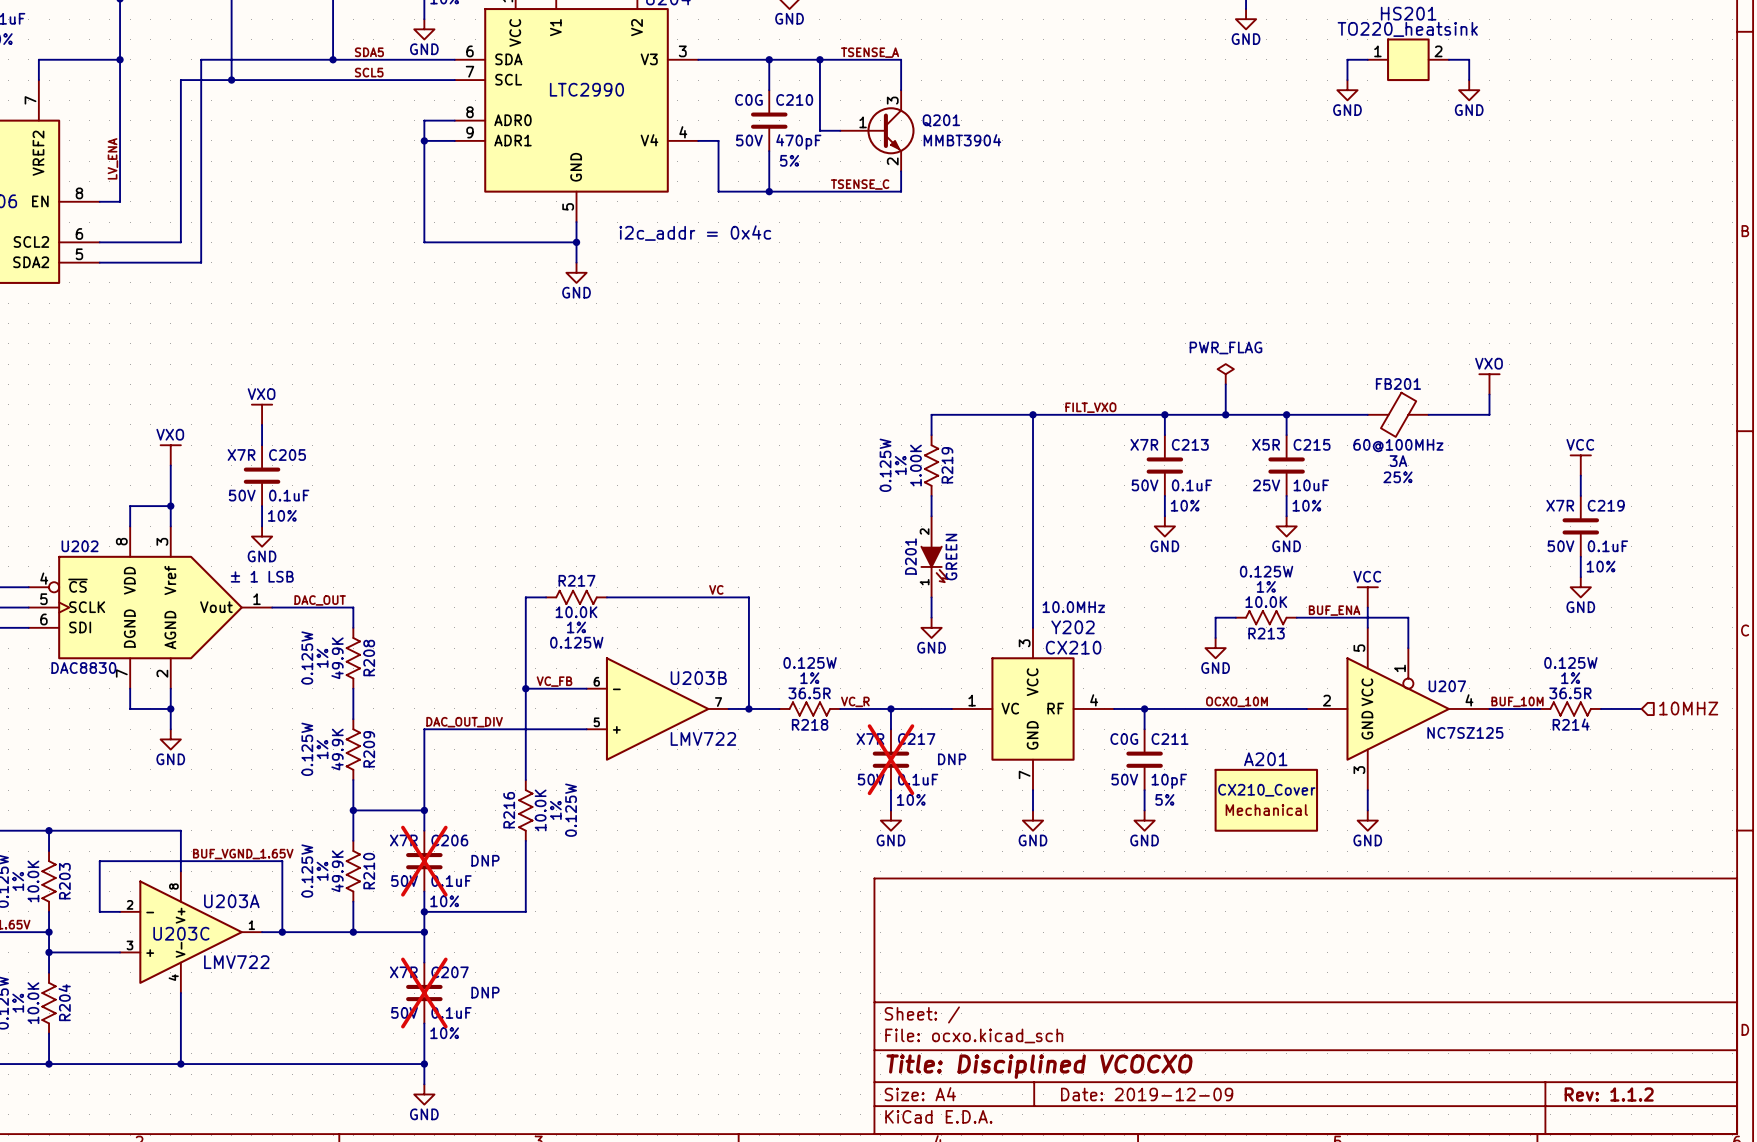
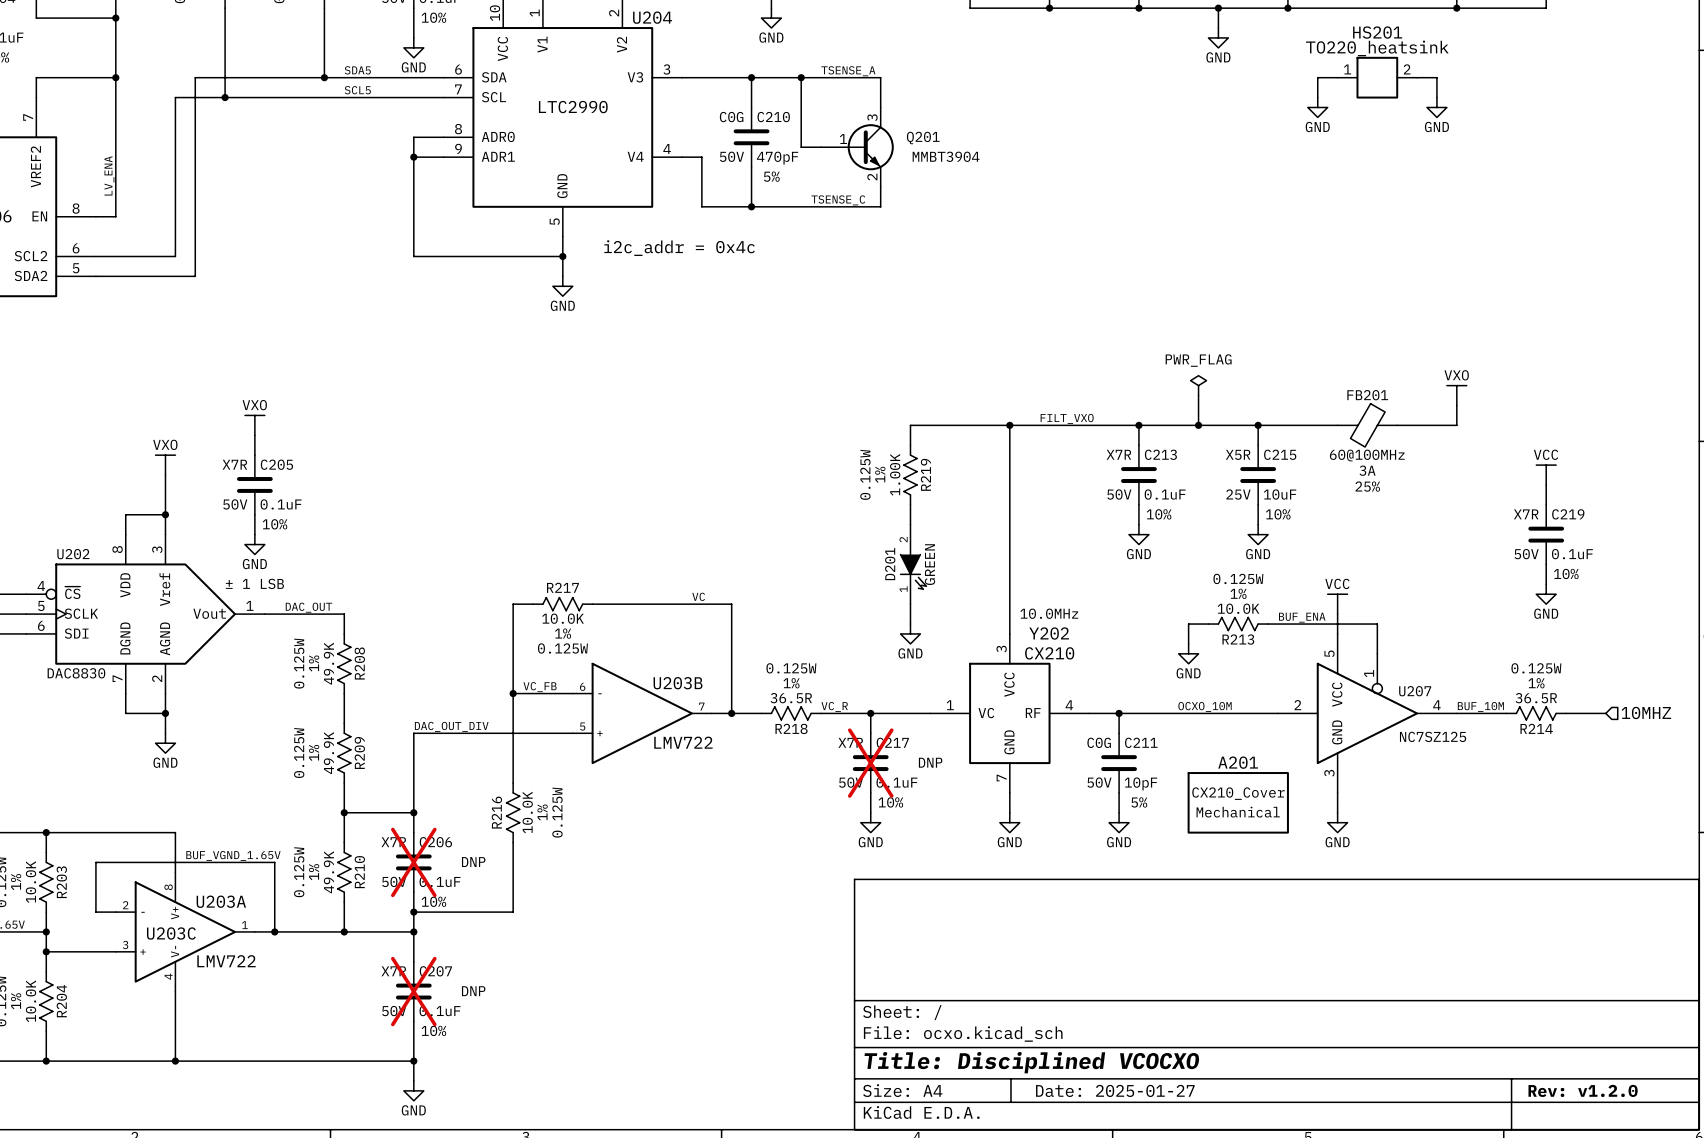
title block: Date: 2019-12-09 (1147, 1094) -> Date: 2025-01-27 (1115, 1090)
title block: Rev: 1.1.2 (1609, 1094) -> Rev: v1.2.0 (1583, 1090)

